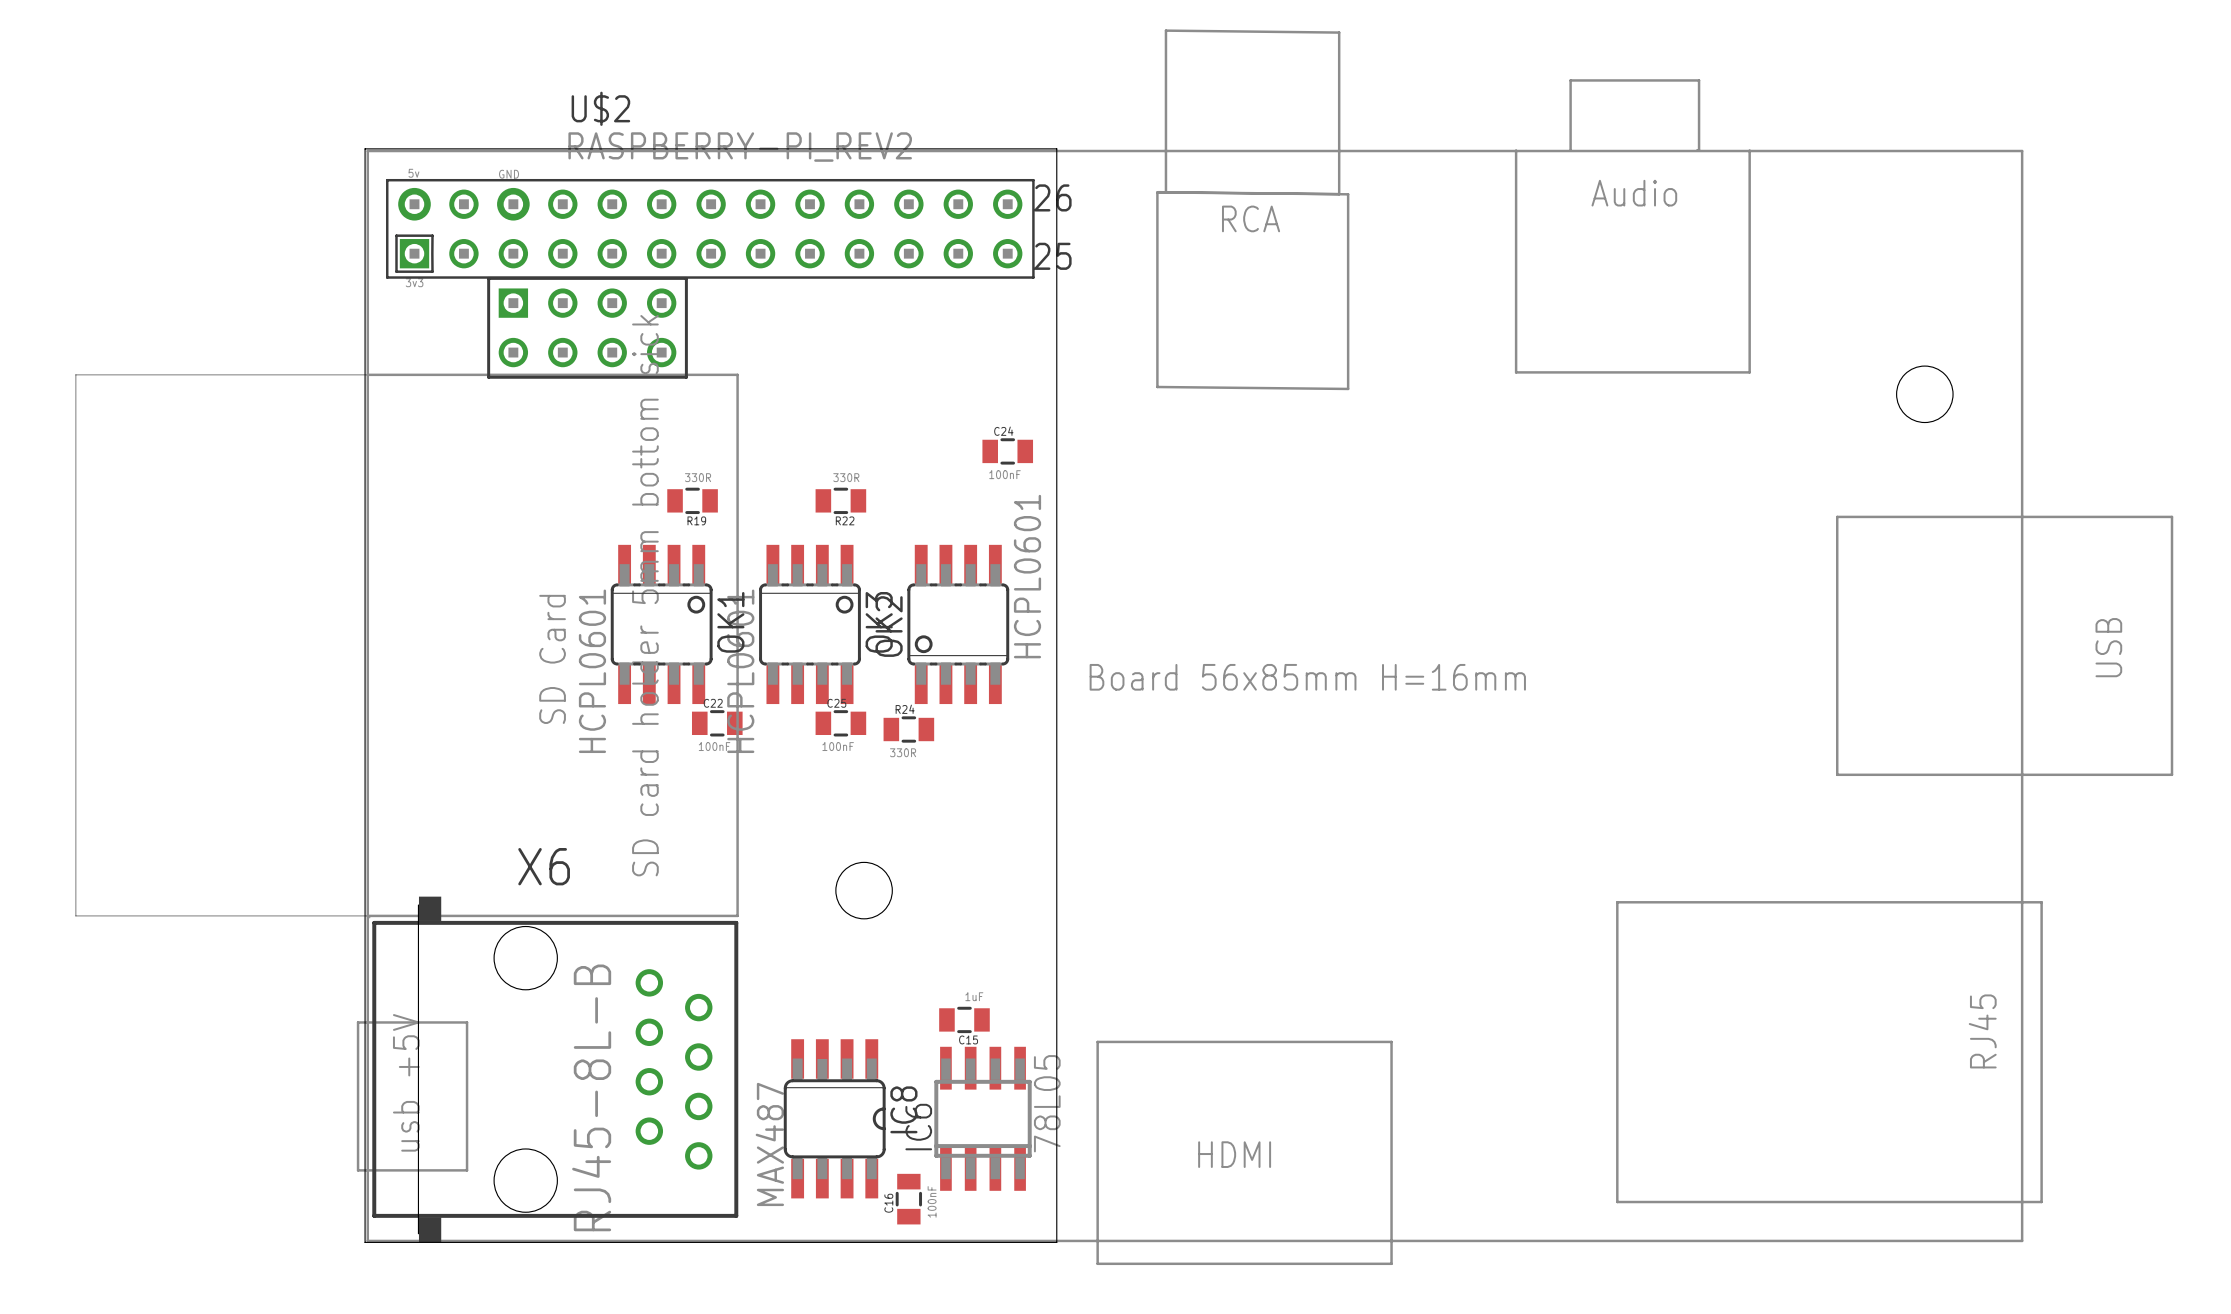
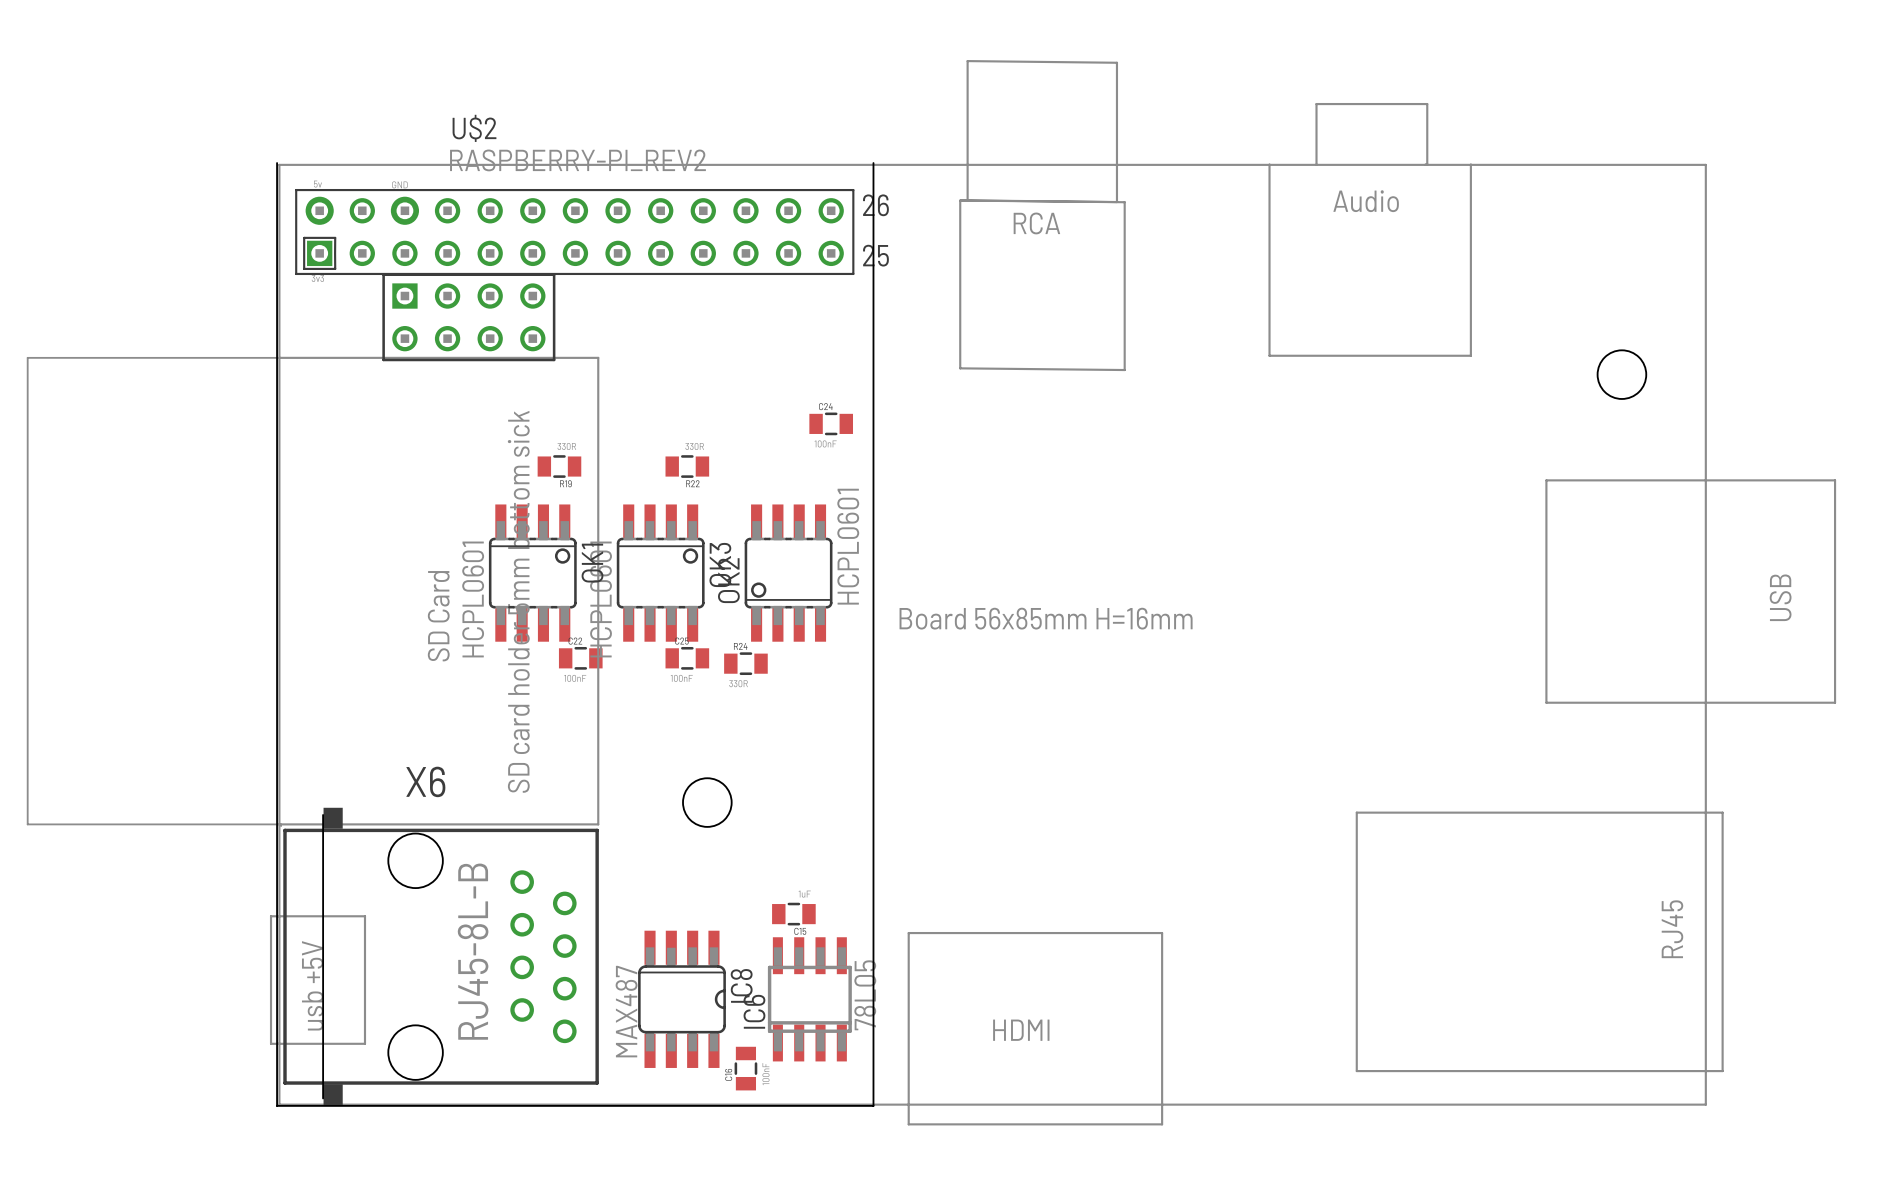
board edge: (365, 148) (1056, 148) -> none

